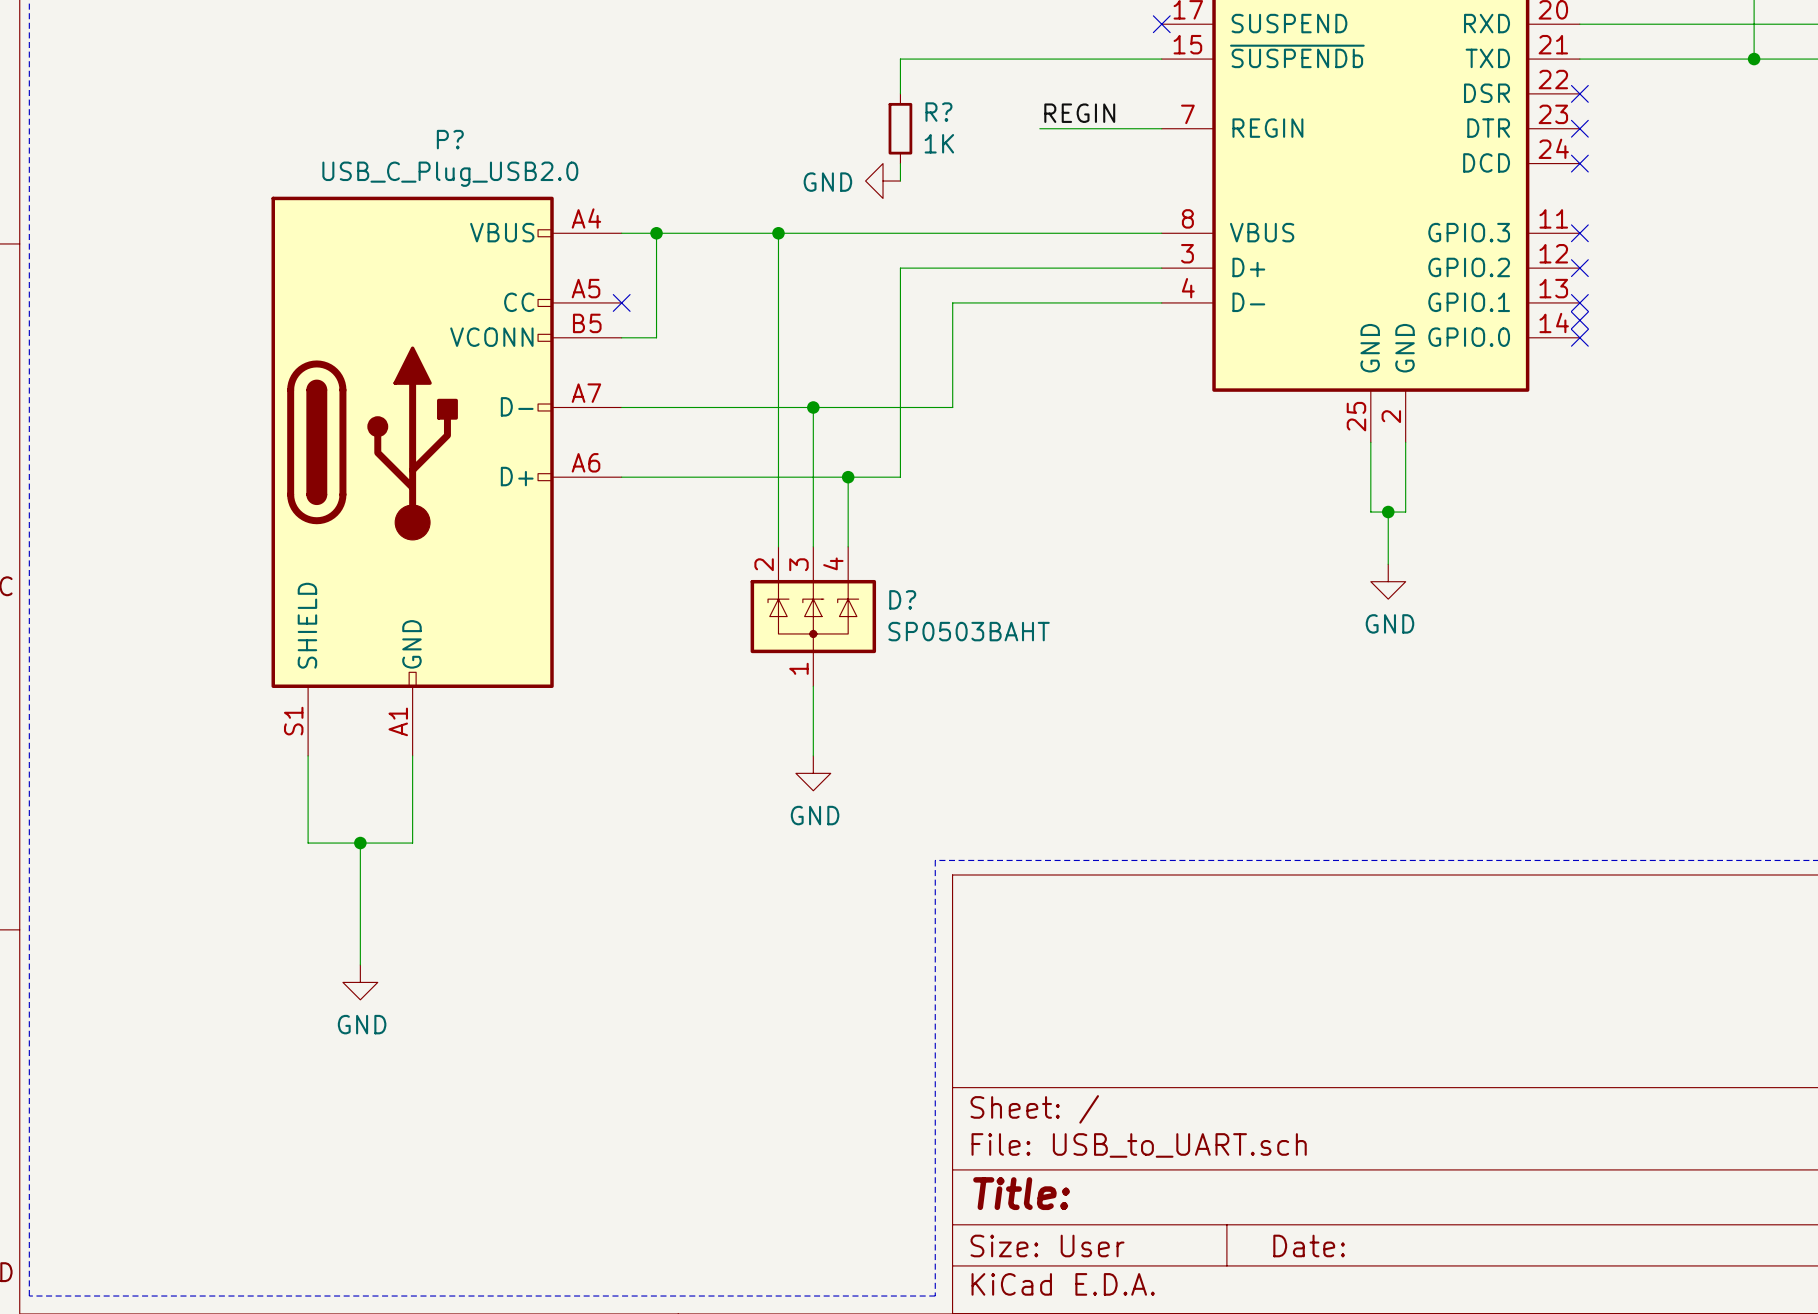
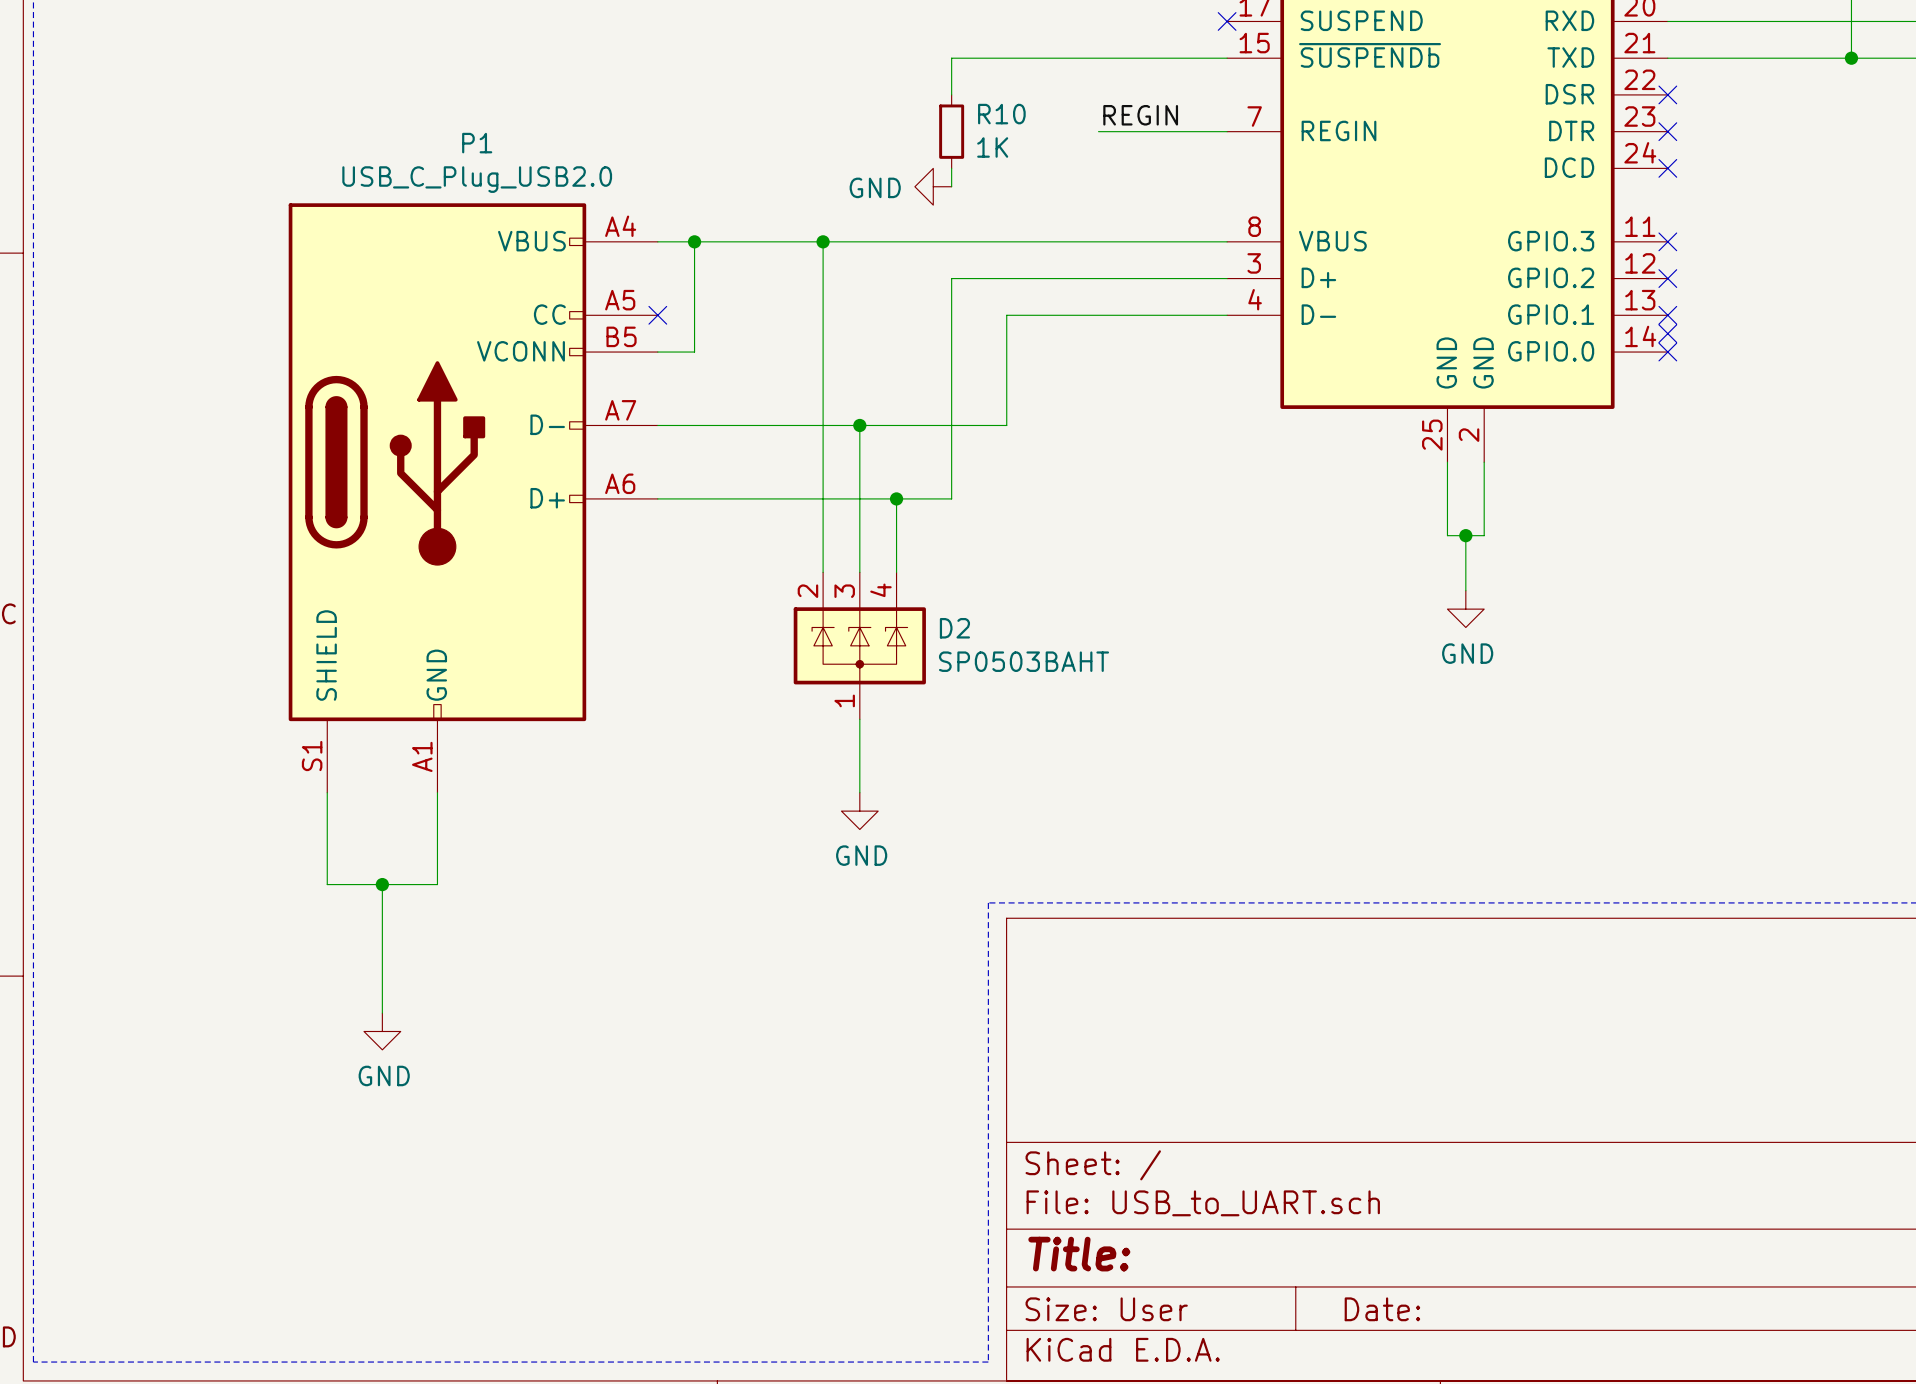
R? name: R? (938, 112) -> R10 (1001, 114)
P? name: P? (450, 139) -> P1 (477, 143)
D? name: D? (902, 599) -> D2 (954, 628)

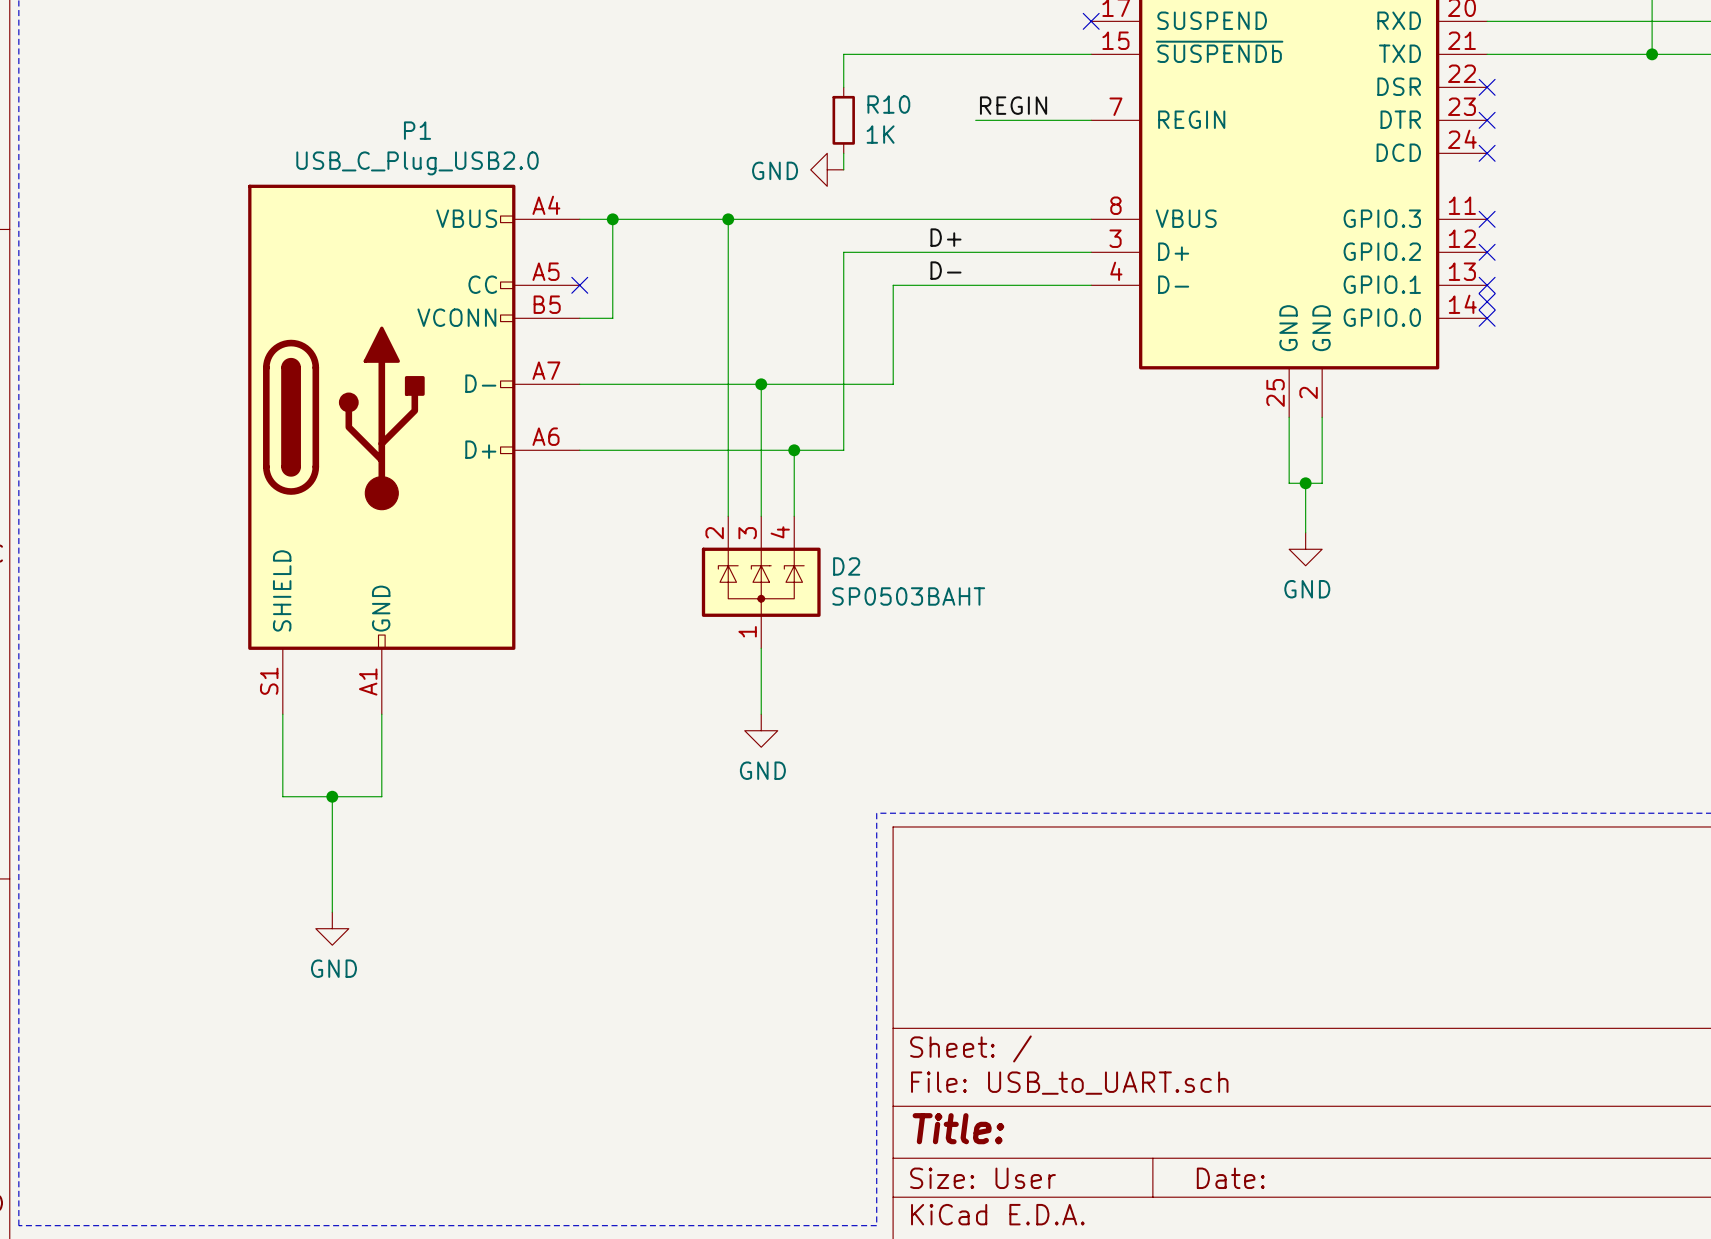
label: none -> D+ (945, 237)
label: none -> D- (945, 270)

